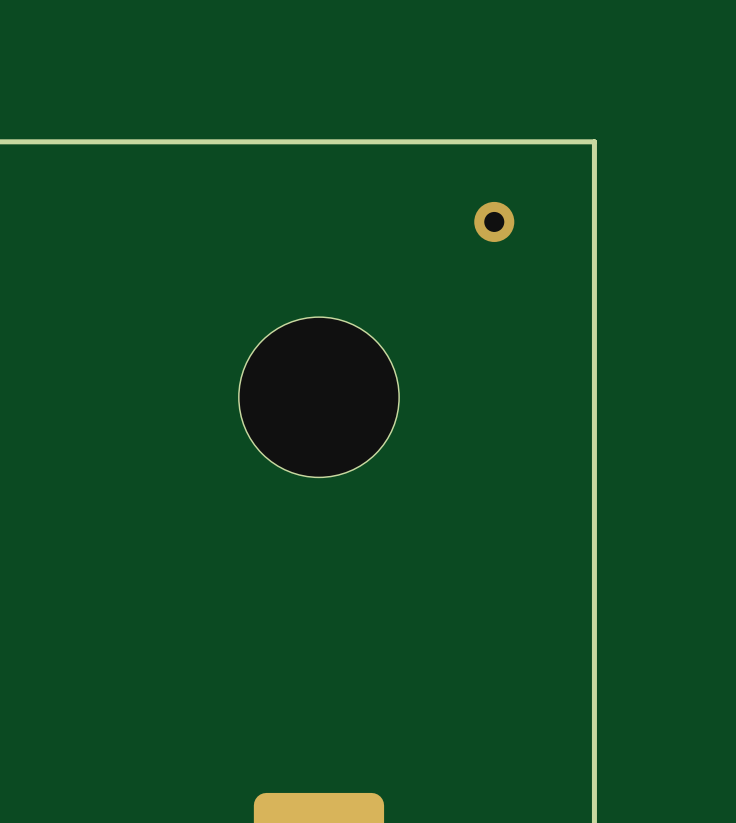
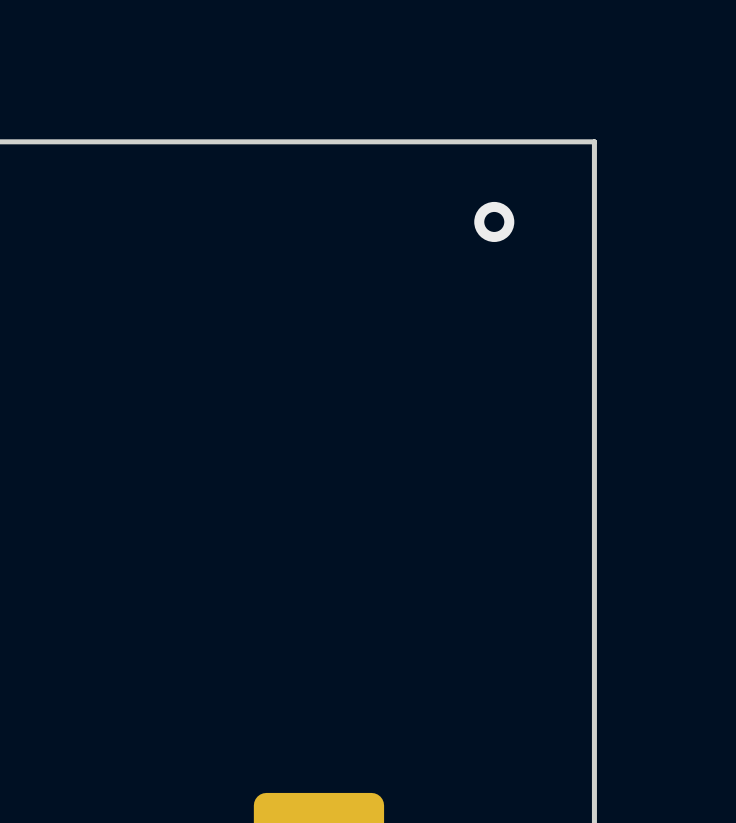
part: (318, 397) -> none

